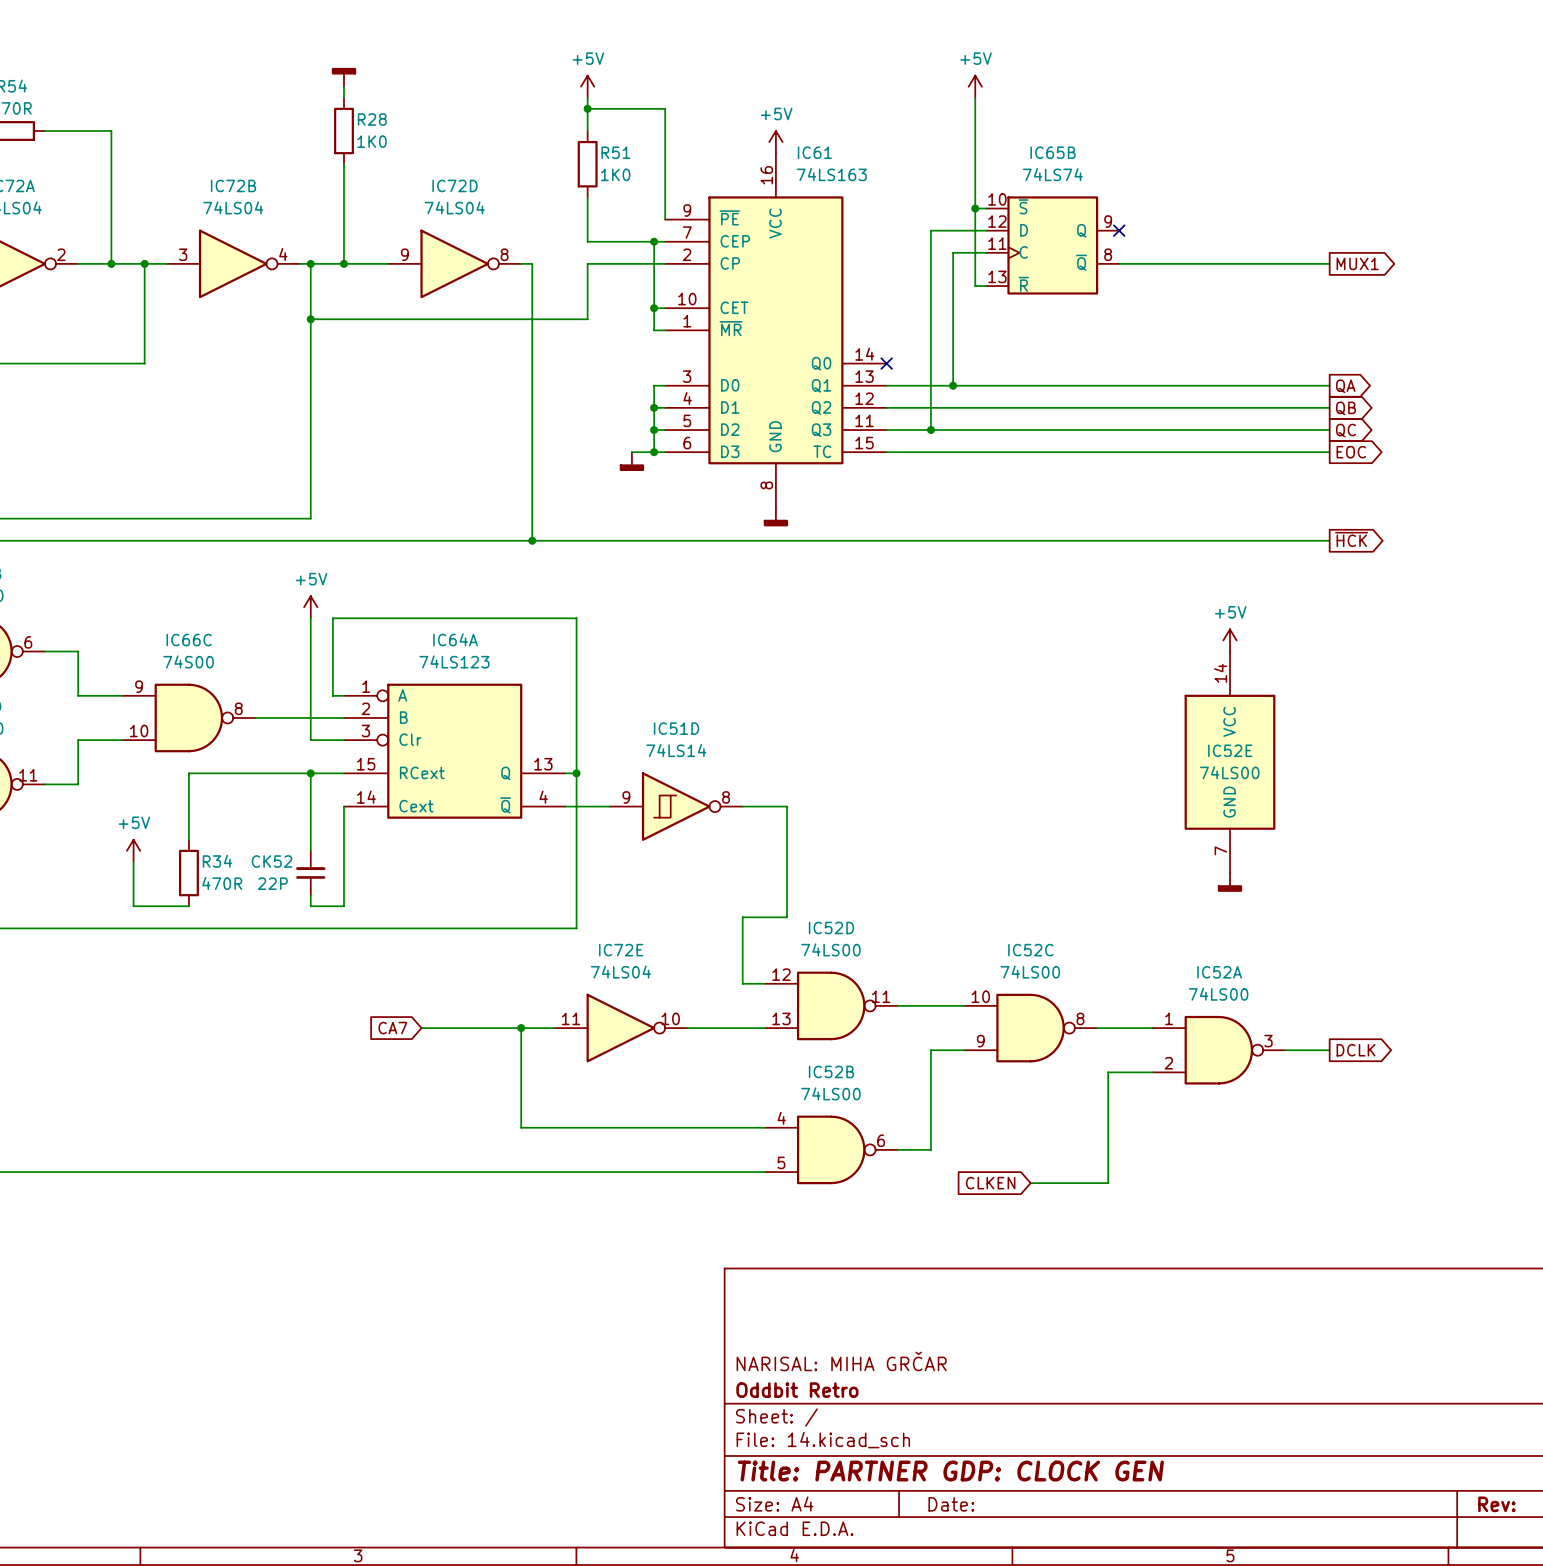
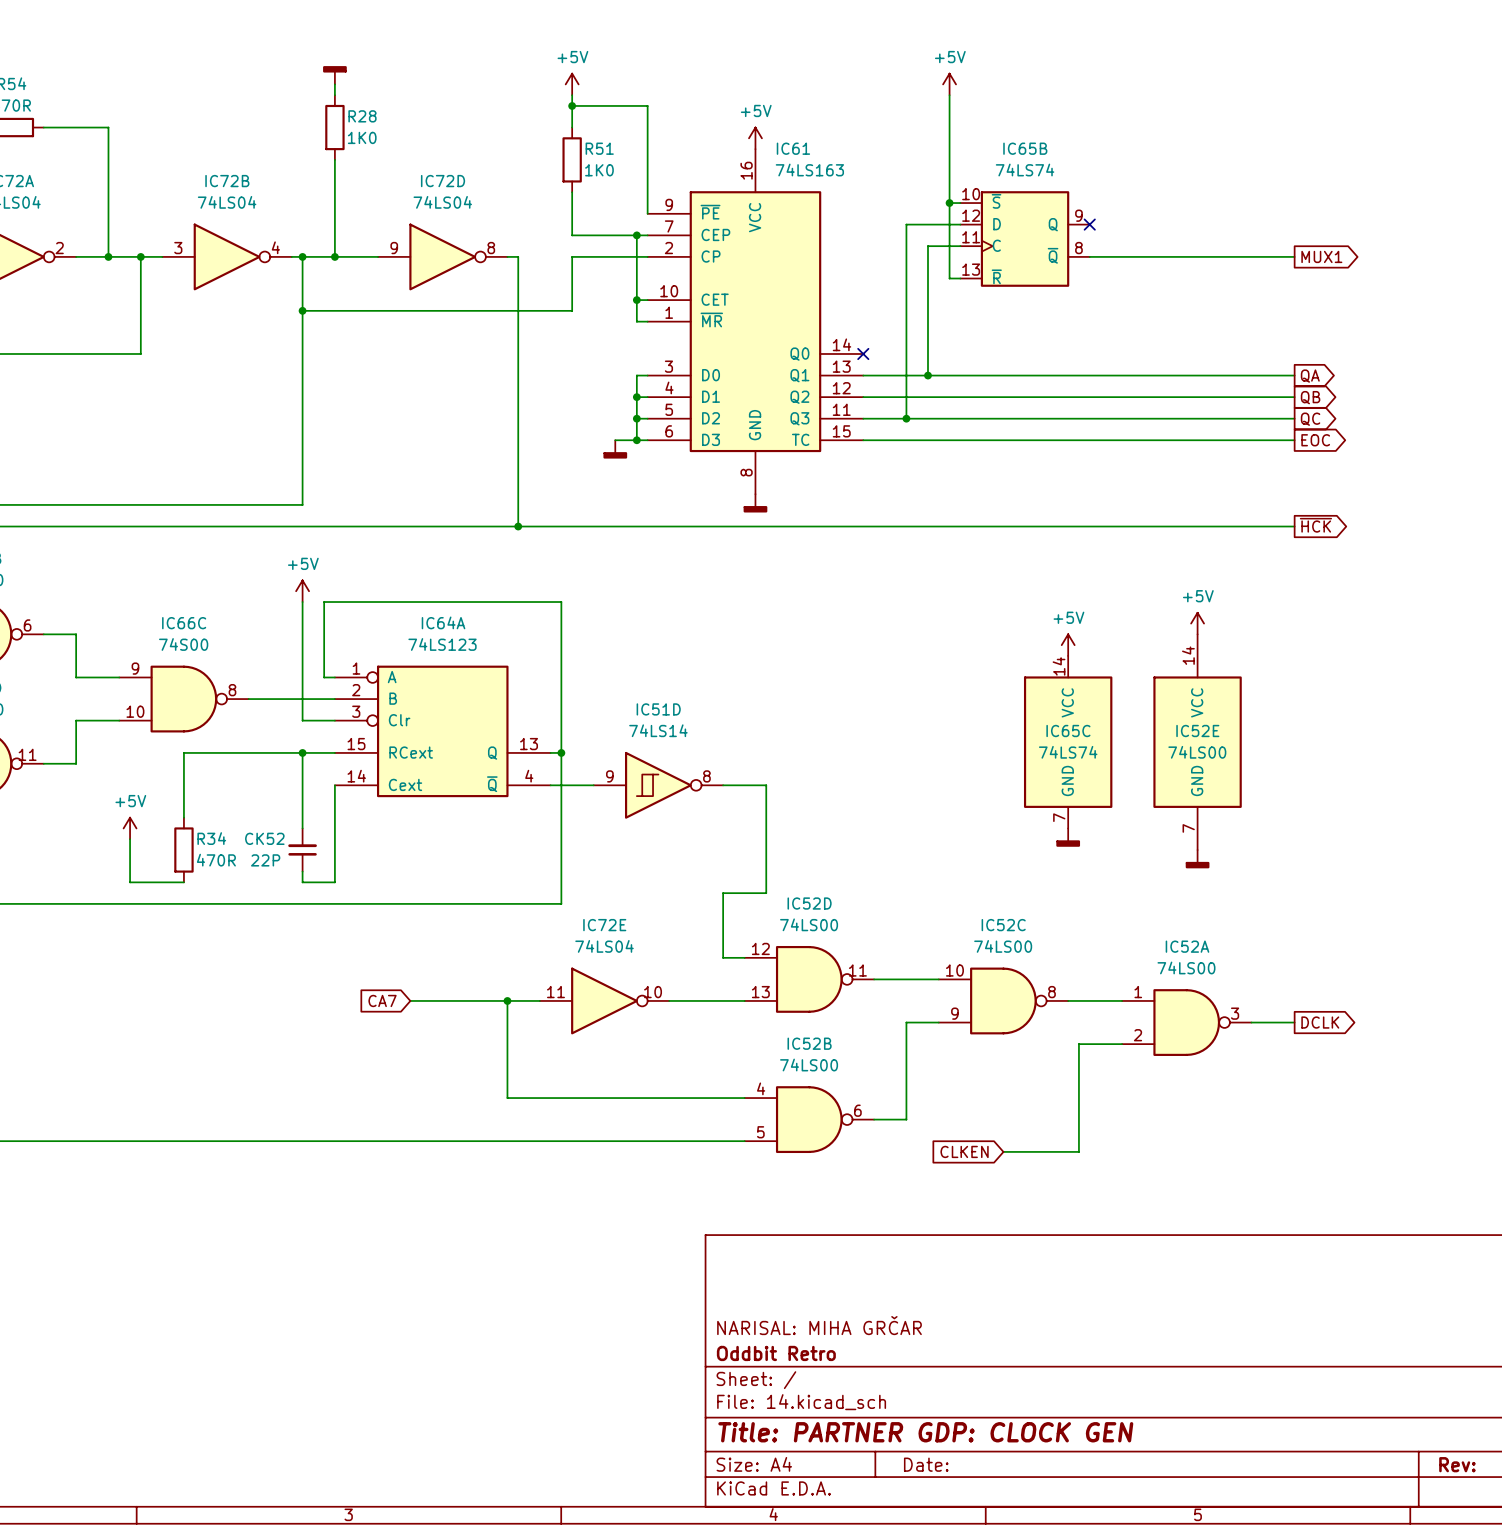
power symbol: none -> +5V (1068, 645)
IC65C: none -> 74LS74 (1068, 742)
power symbol: none -> (1068, 837)

